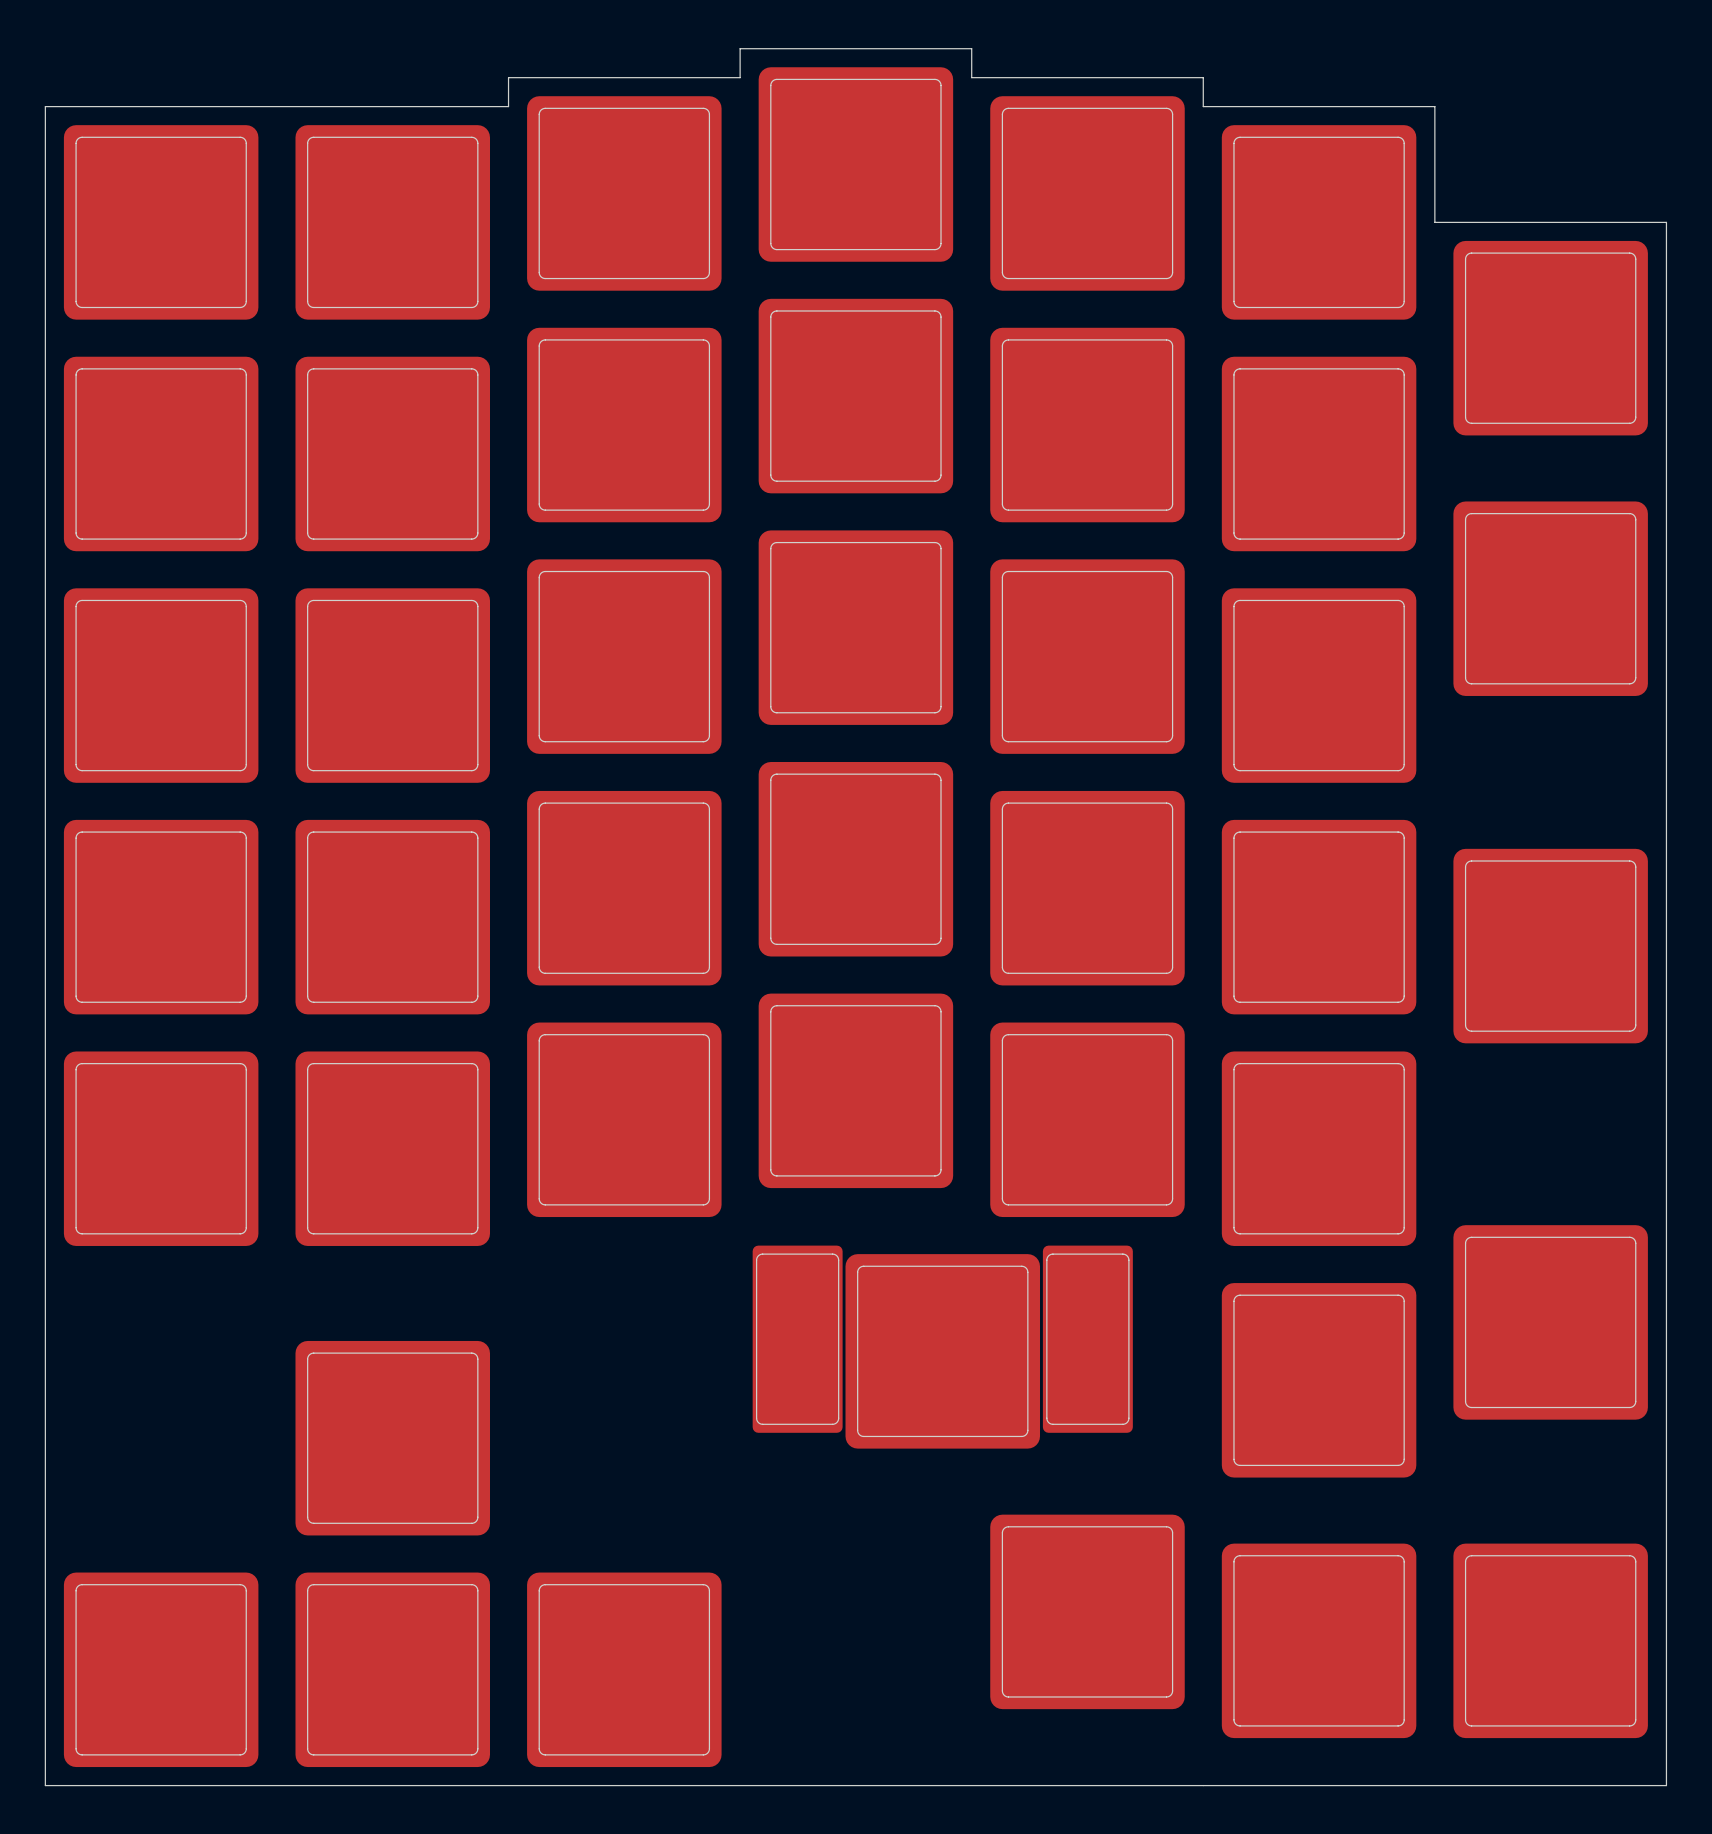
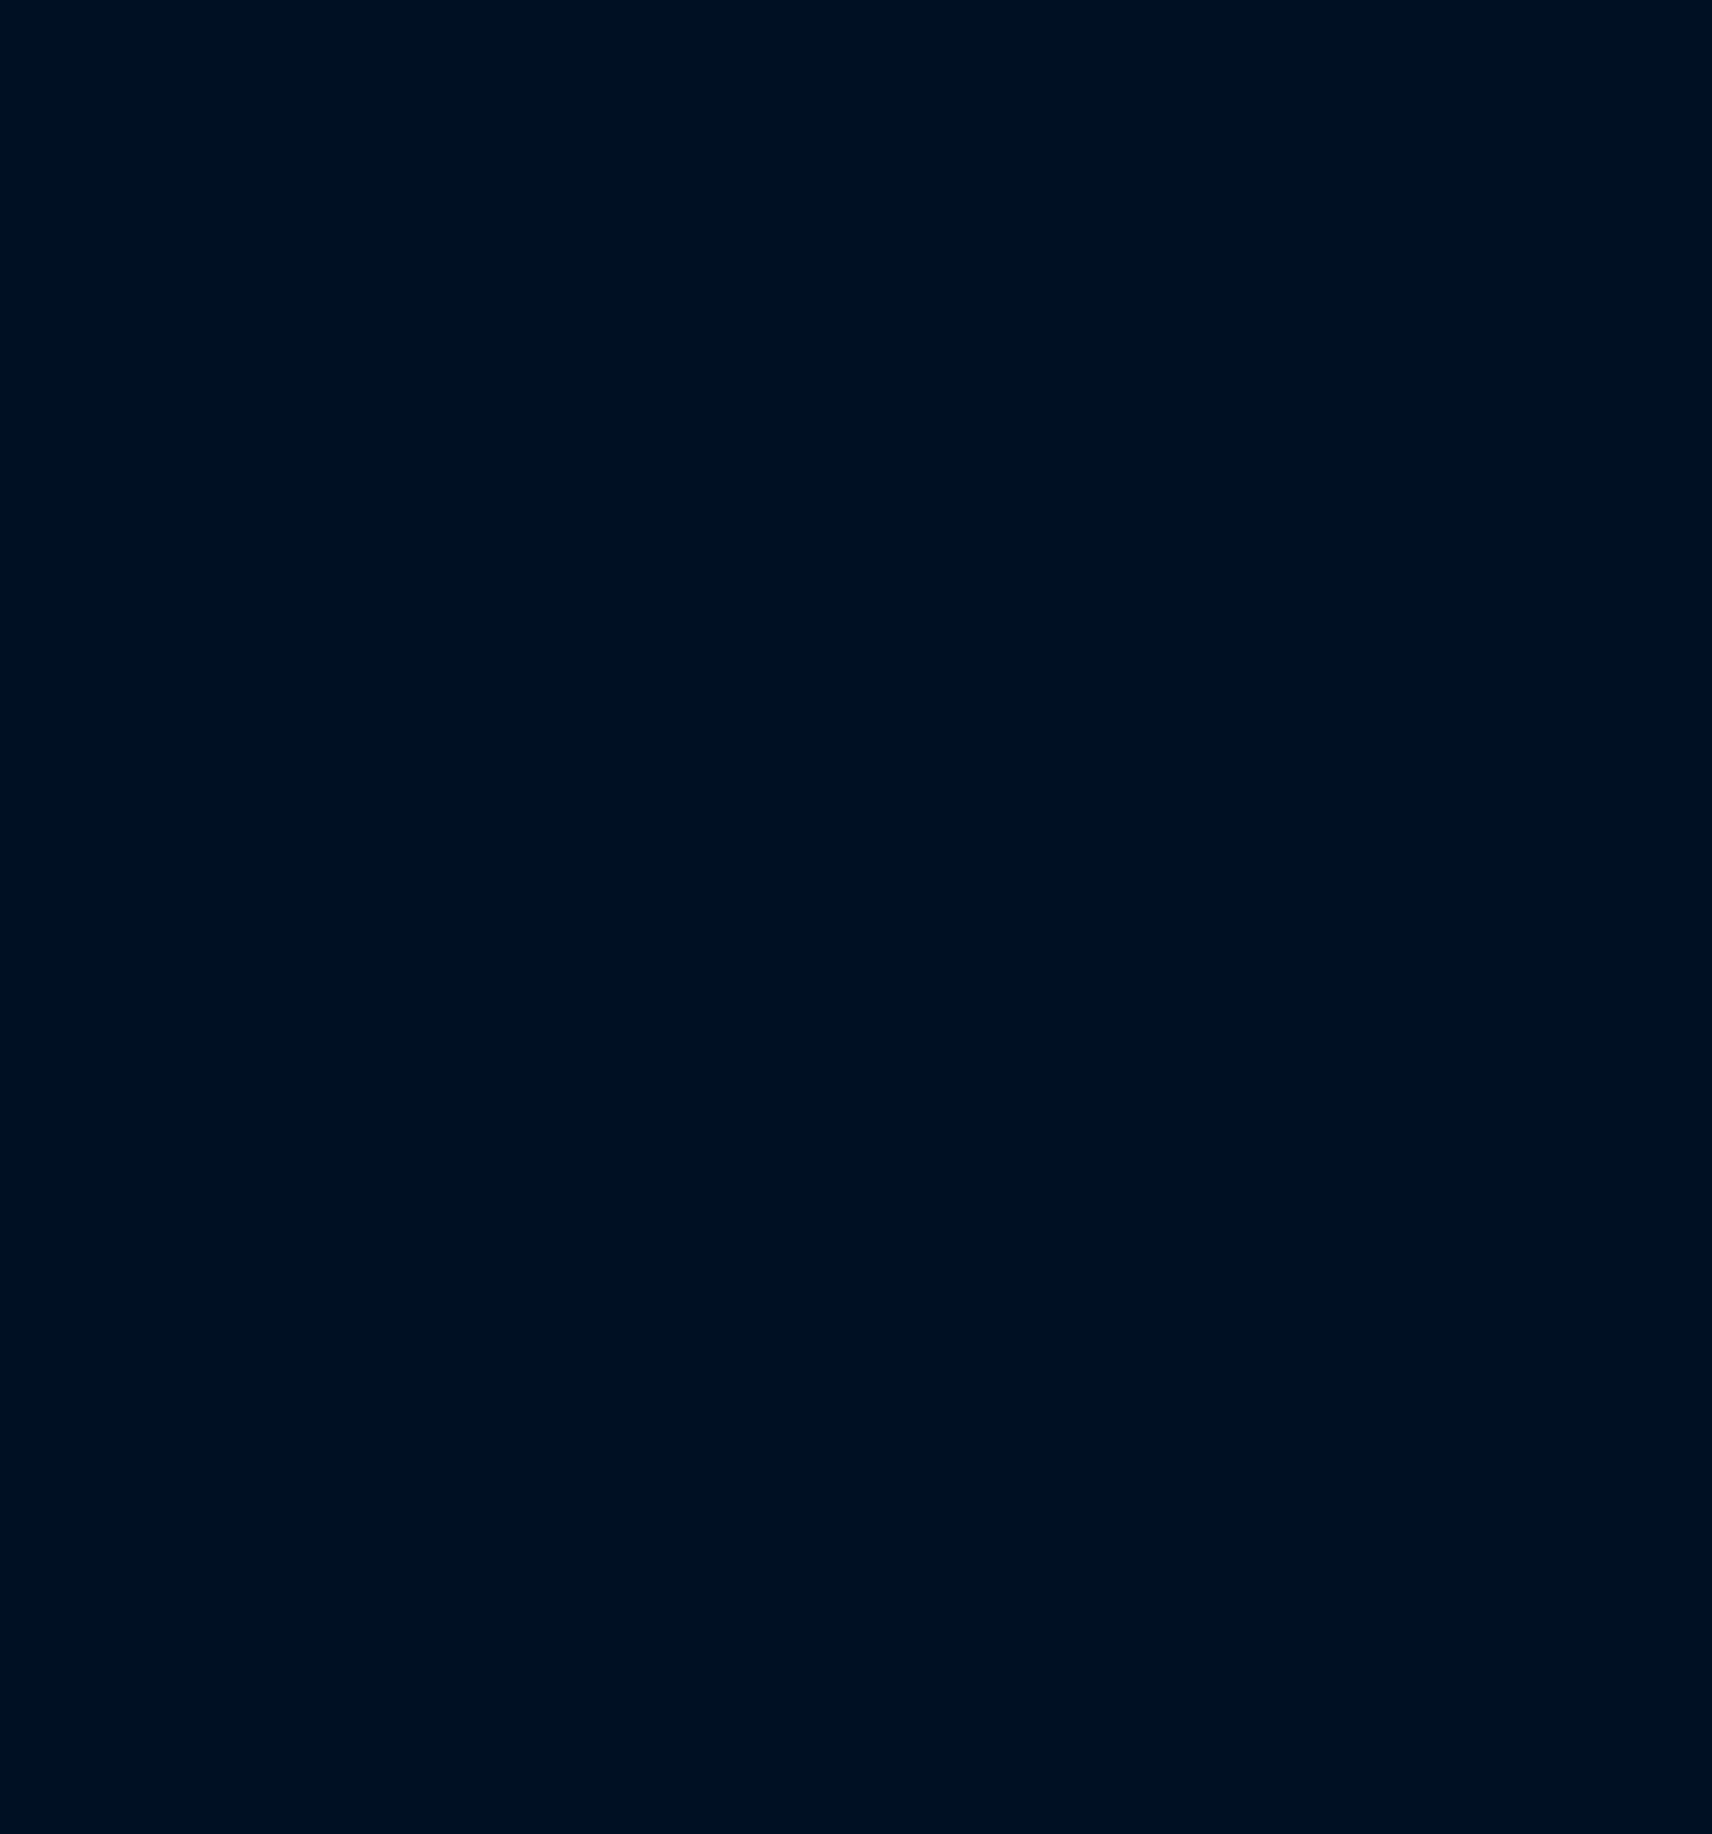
board edge: (740, 48) (971, 48) (971, 77) (1203, 77) (1203, 106) (1434, 106) (1434, 222) (1666, 222) (1666, 1785) (45, 1785) (45, 106) (508, 106) (508, 77) (740, 77) (740, 48) -> none
part: (855, 164) -> none
part: (624, 193) -> none
part: (1087, 193) -> none
part: (161, 222) -> none
part: (392, 222) -> none
part: (1319, 222) -> none
part: (1550, 338) -> none
part: (855, 396) -> none
part: (624, 425) -> none
part: (1087, 425) -> none
part: (161, 453) -> none
part: (392, 453) -> none
part: (1319, 453) -> none
part: (1550, 598) -> none
part: (855, 627) -> none
part: (624, 656) -> none
part: (1087, 656) -> none
part: (161, 685) -> none
part: (392, 685) -> none
part: (1319, 685) -> none
part: (855, 859) -> none
part: (624, 888) -> none
part: (1087, 888) -> none
part: (161, 917) -> none
part: (392, 917) -> none
part: (1319, 917) -> none
part: (1550, 946) -> none
part: (855, 1090) -> none
part: (624, 1119) -> none
part: (1087, 1119) -> none
part: (161, 1148) -> none
part: (392, 1148) -> none
part: (1319, 1148) -> none
part: (1550, 1322) -> none
part: (942, 1347) -> none
part: (1319, 1380) -> none
part: (392, 1438) -> none
part: (1087, 1611) -> none
part: (1319, 1640) -> none
part: (1550, 1640) -> none
part: (161, 1669) -> none
part: (392, 1669) -> none
part: (624, 1669) -> none

